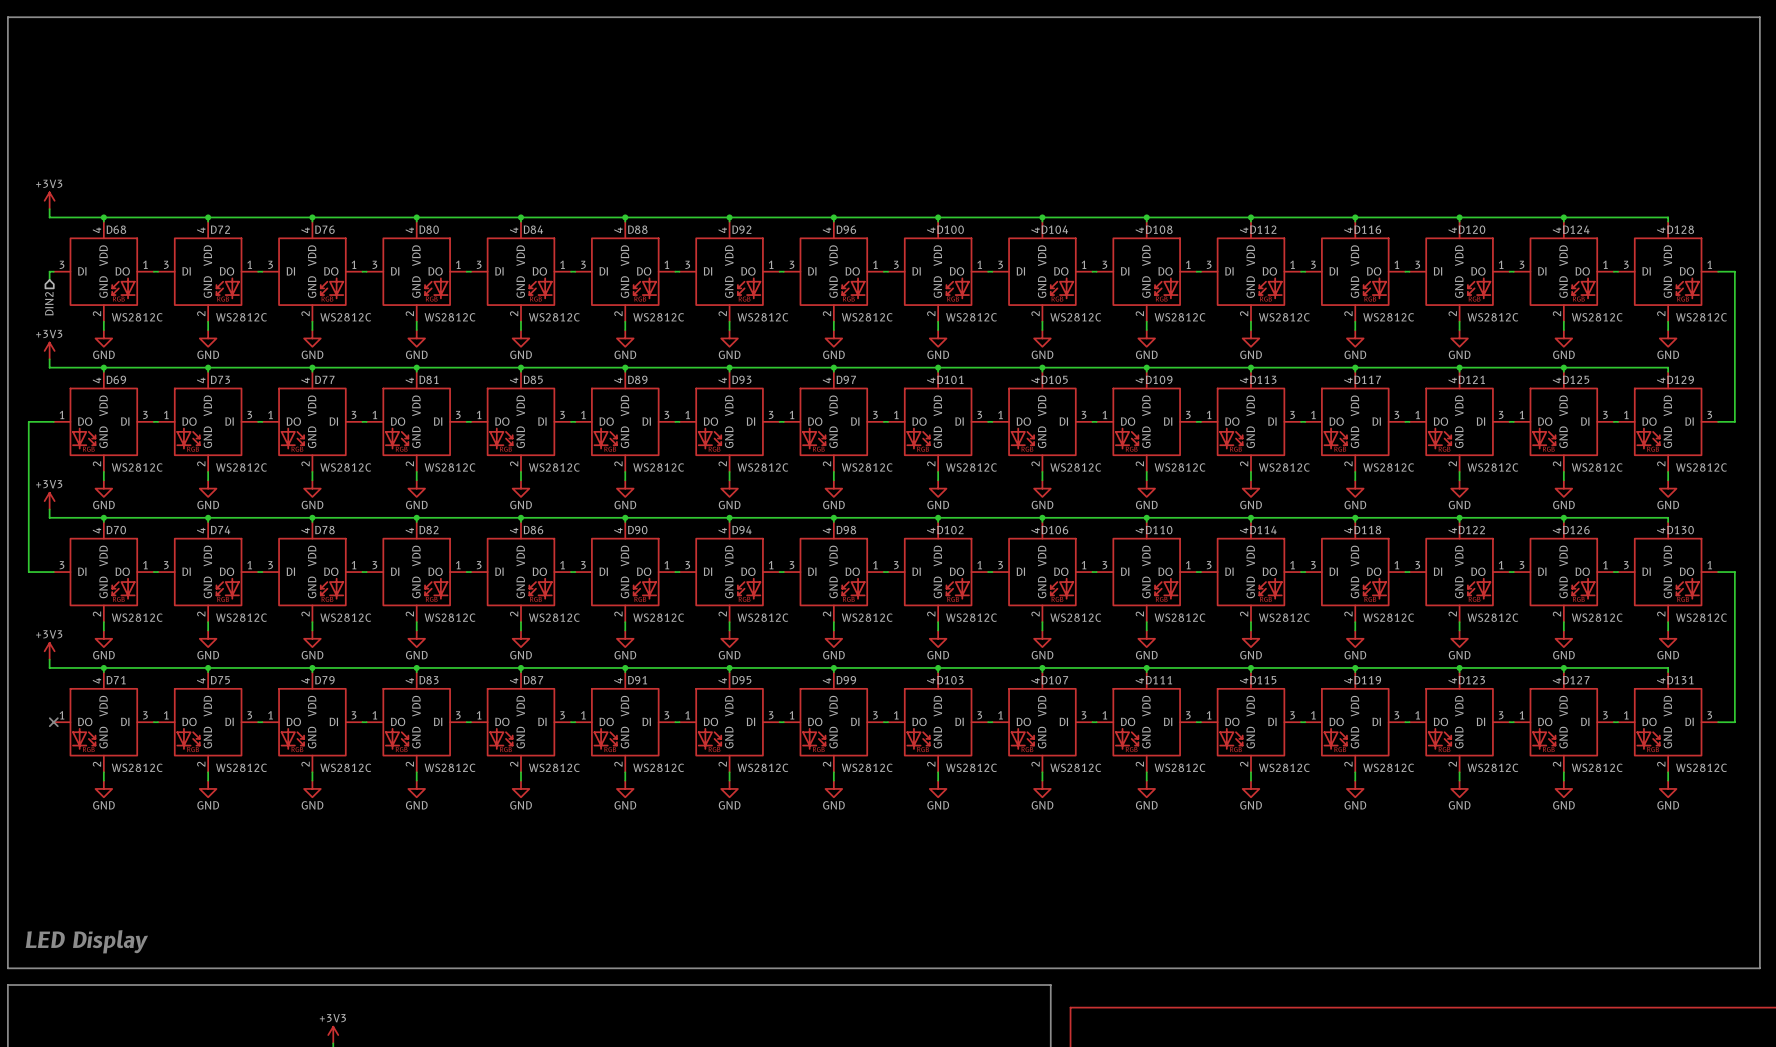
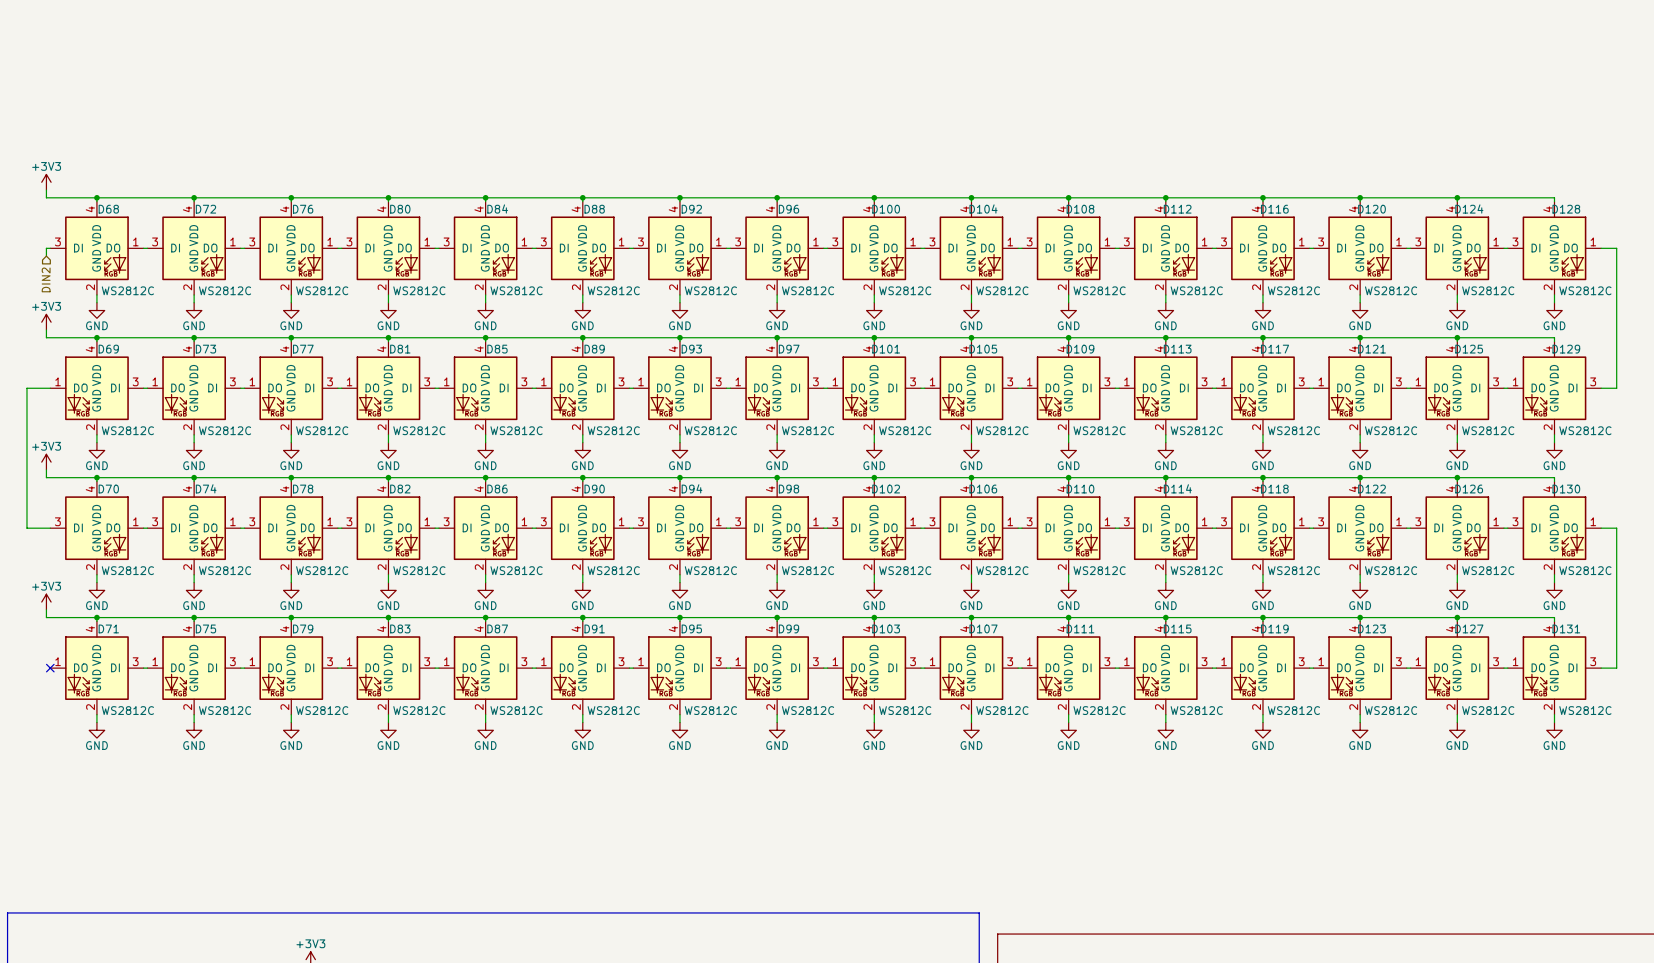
line: (7, 17) (7, 968) (1759, 968) (1759, 17) (7, 17) -> none
text: LED Display (86, 941) -> none

